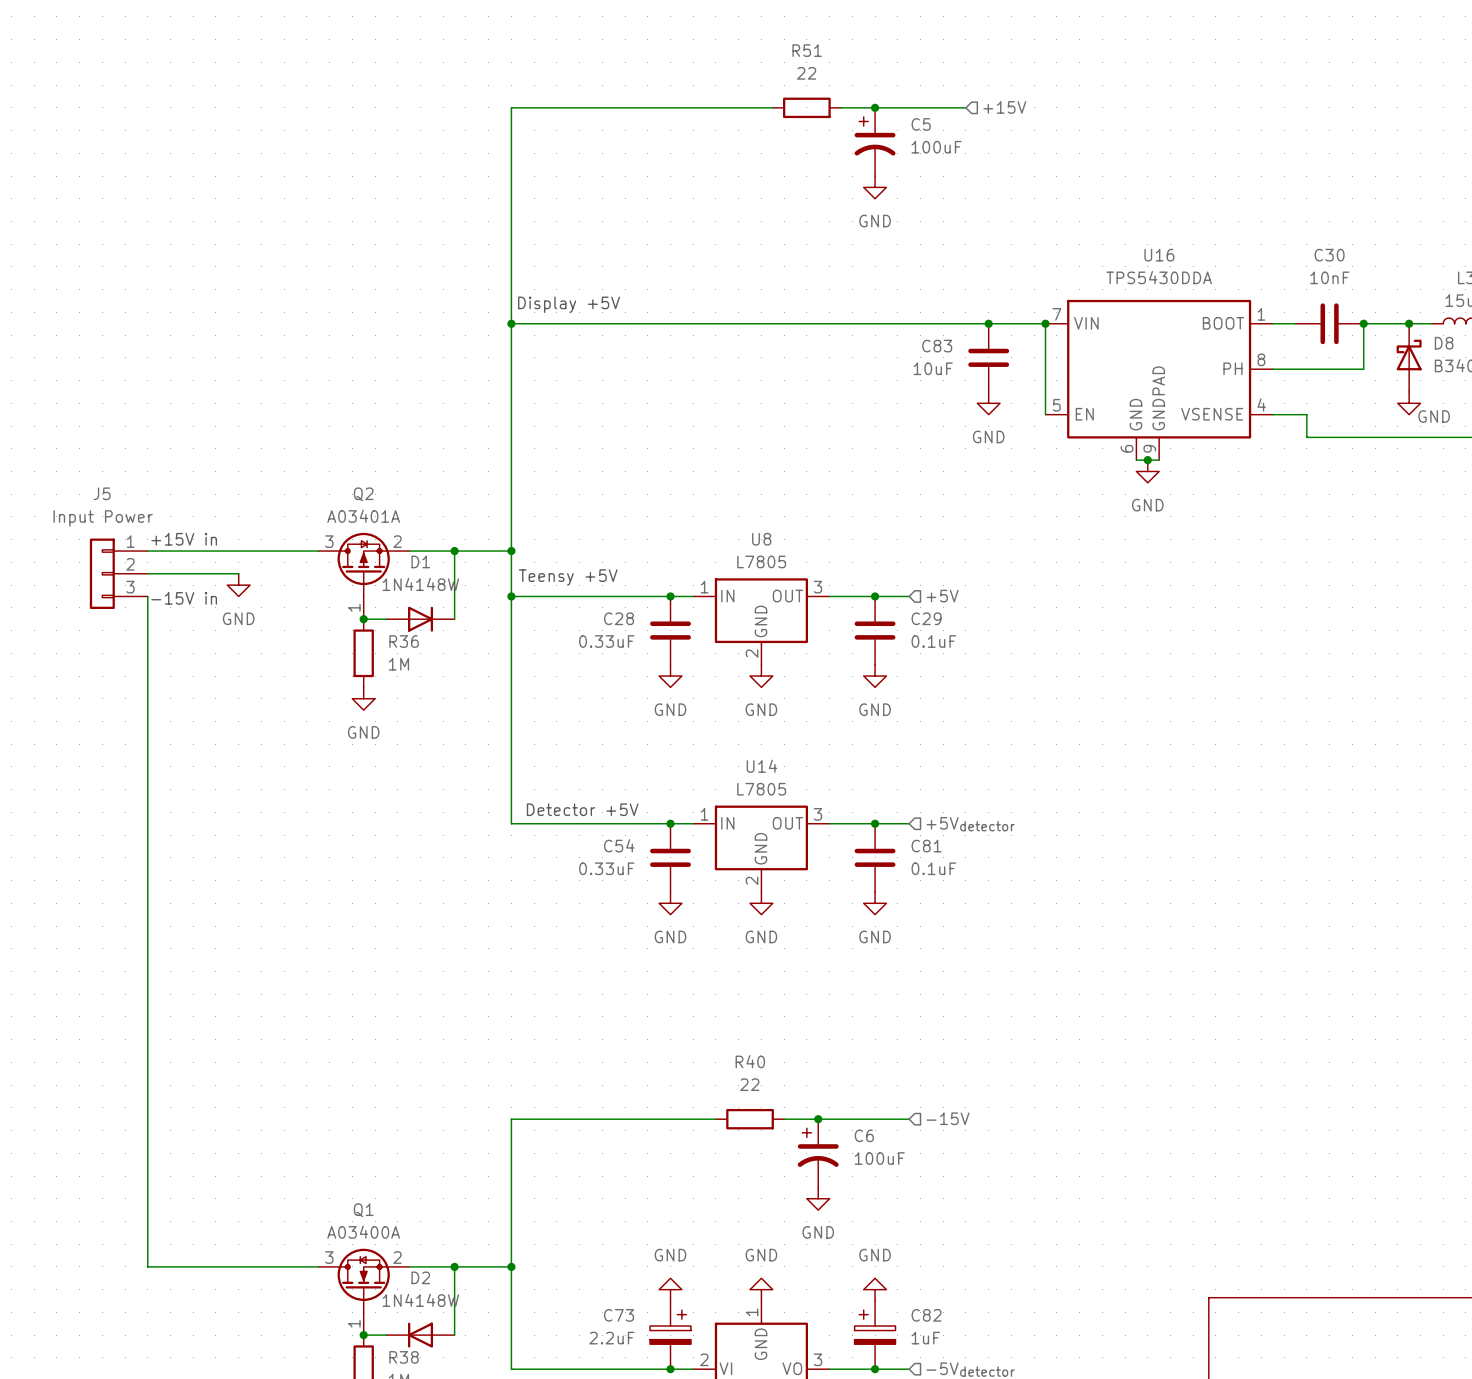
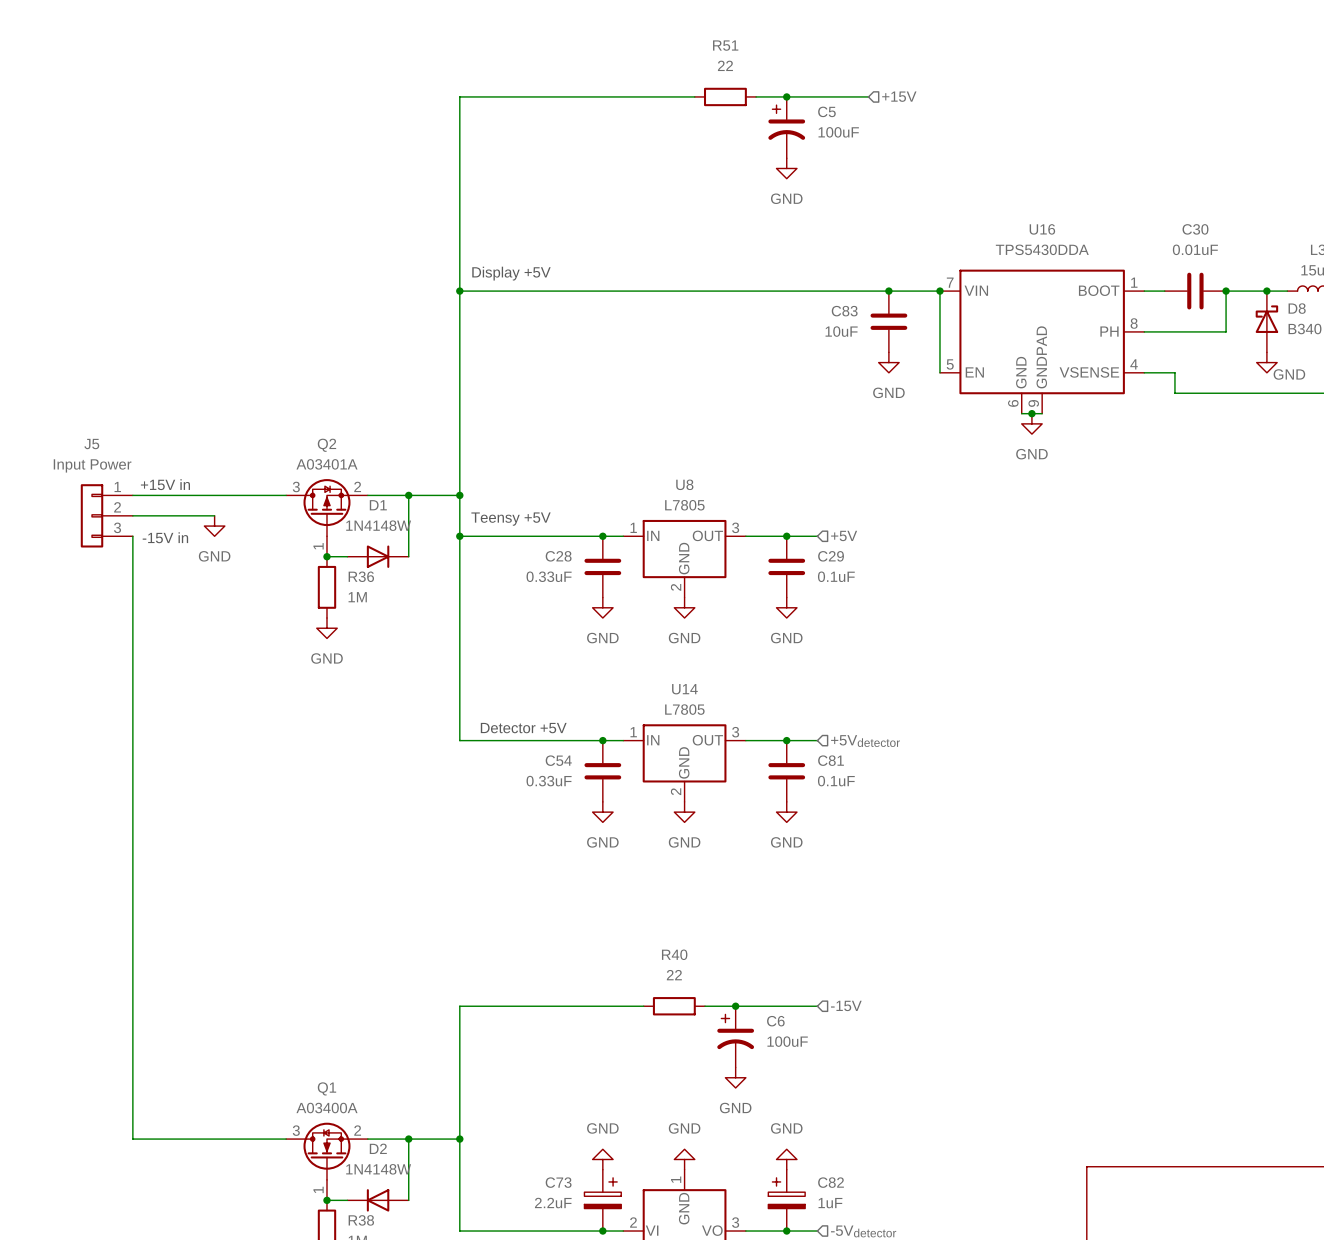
C30 value: 10nF (1329, 277) -> 0.01uF (1195, 249)

